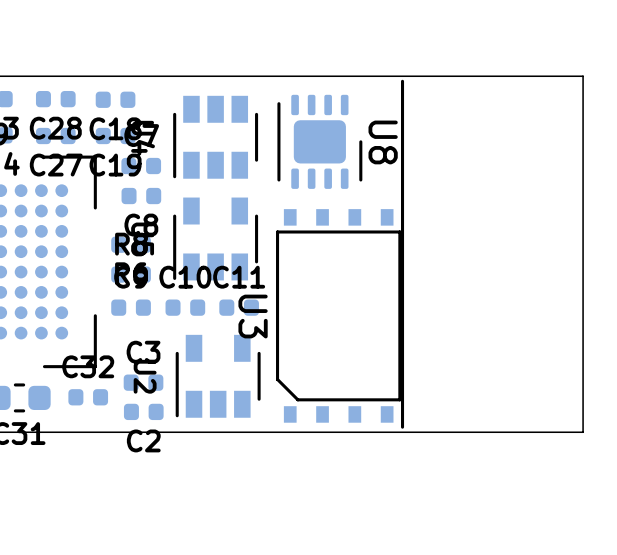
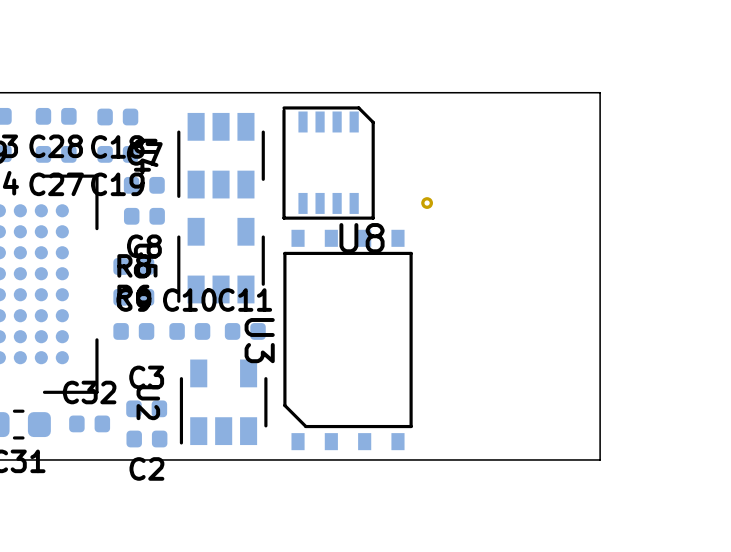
line: (402, 81) (402, 427) -> none
U8 footprint: [277, 94, 363, 189] -> [282, 106, 375, 220]
U8 name position: U8 (383, 142) -> U8 (362, 238)
part: none -> (427, 203)

